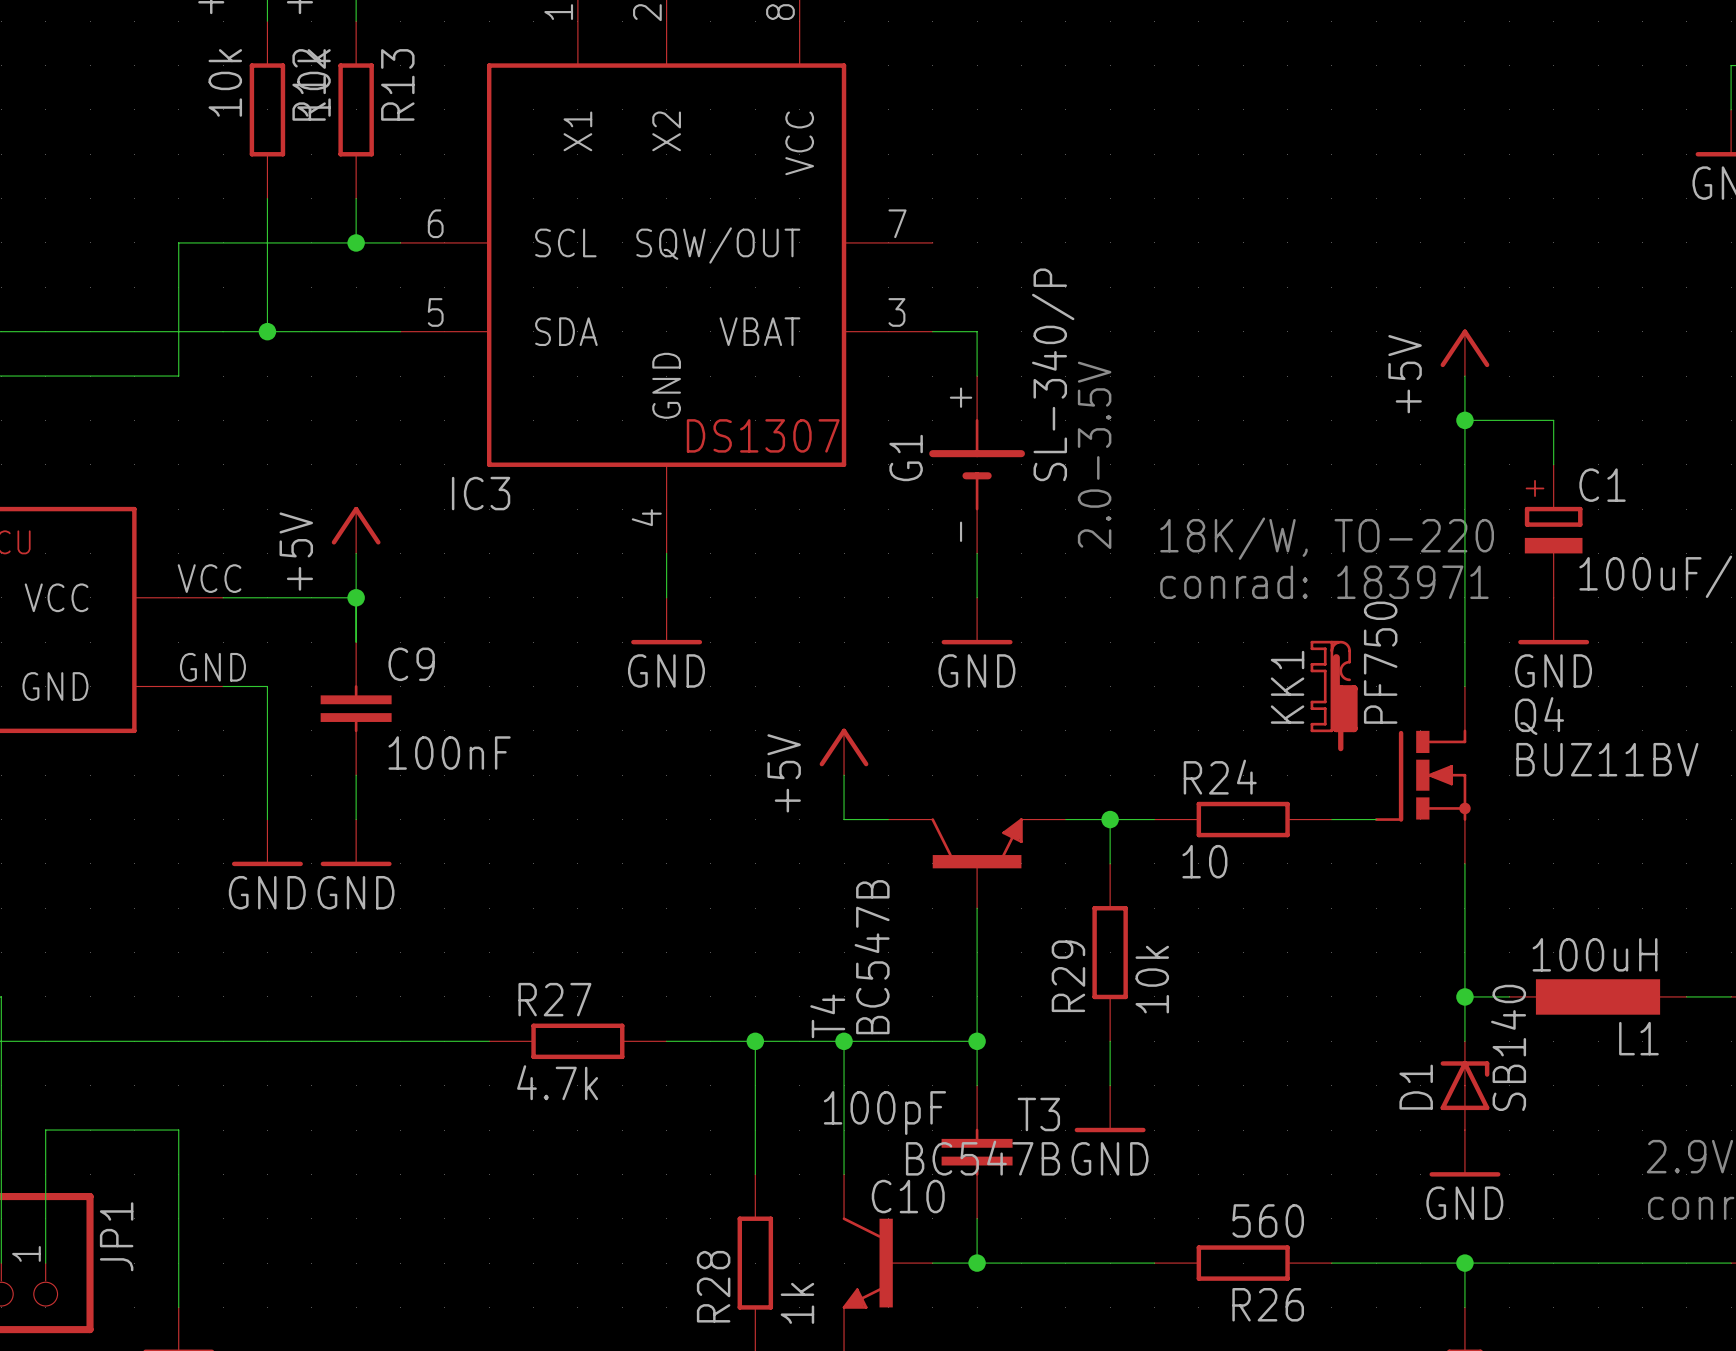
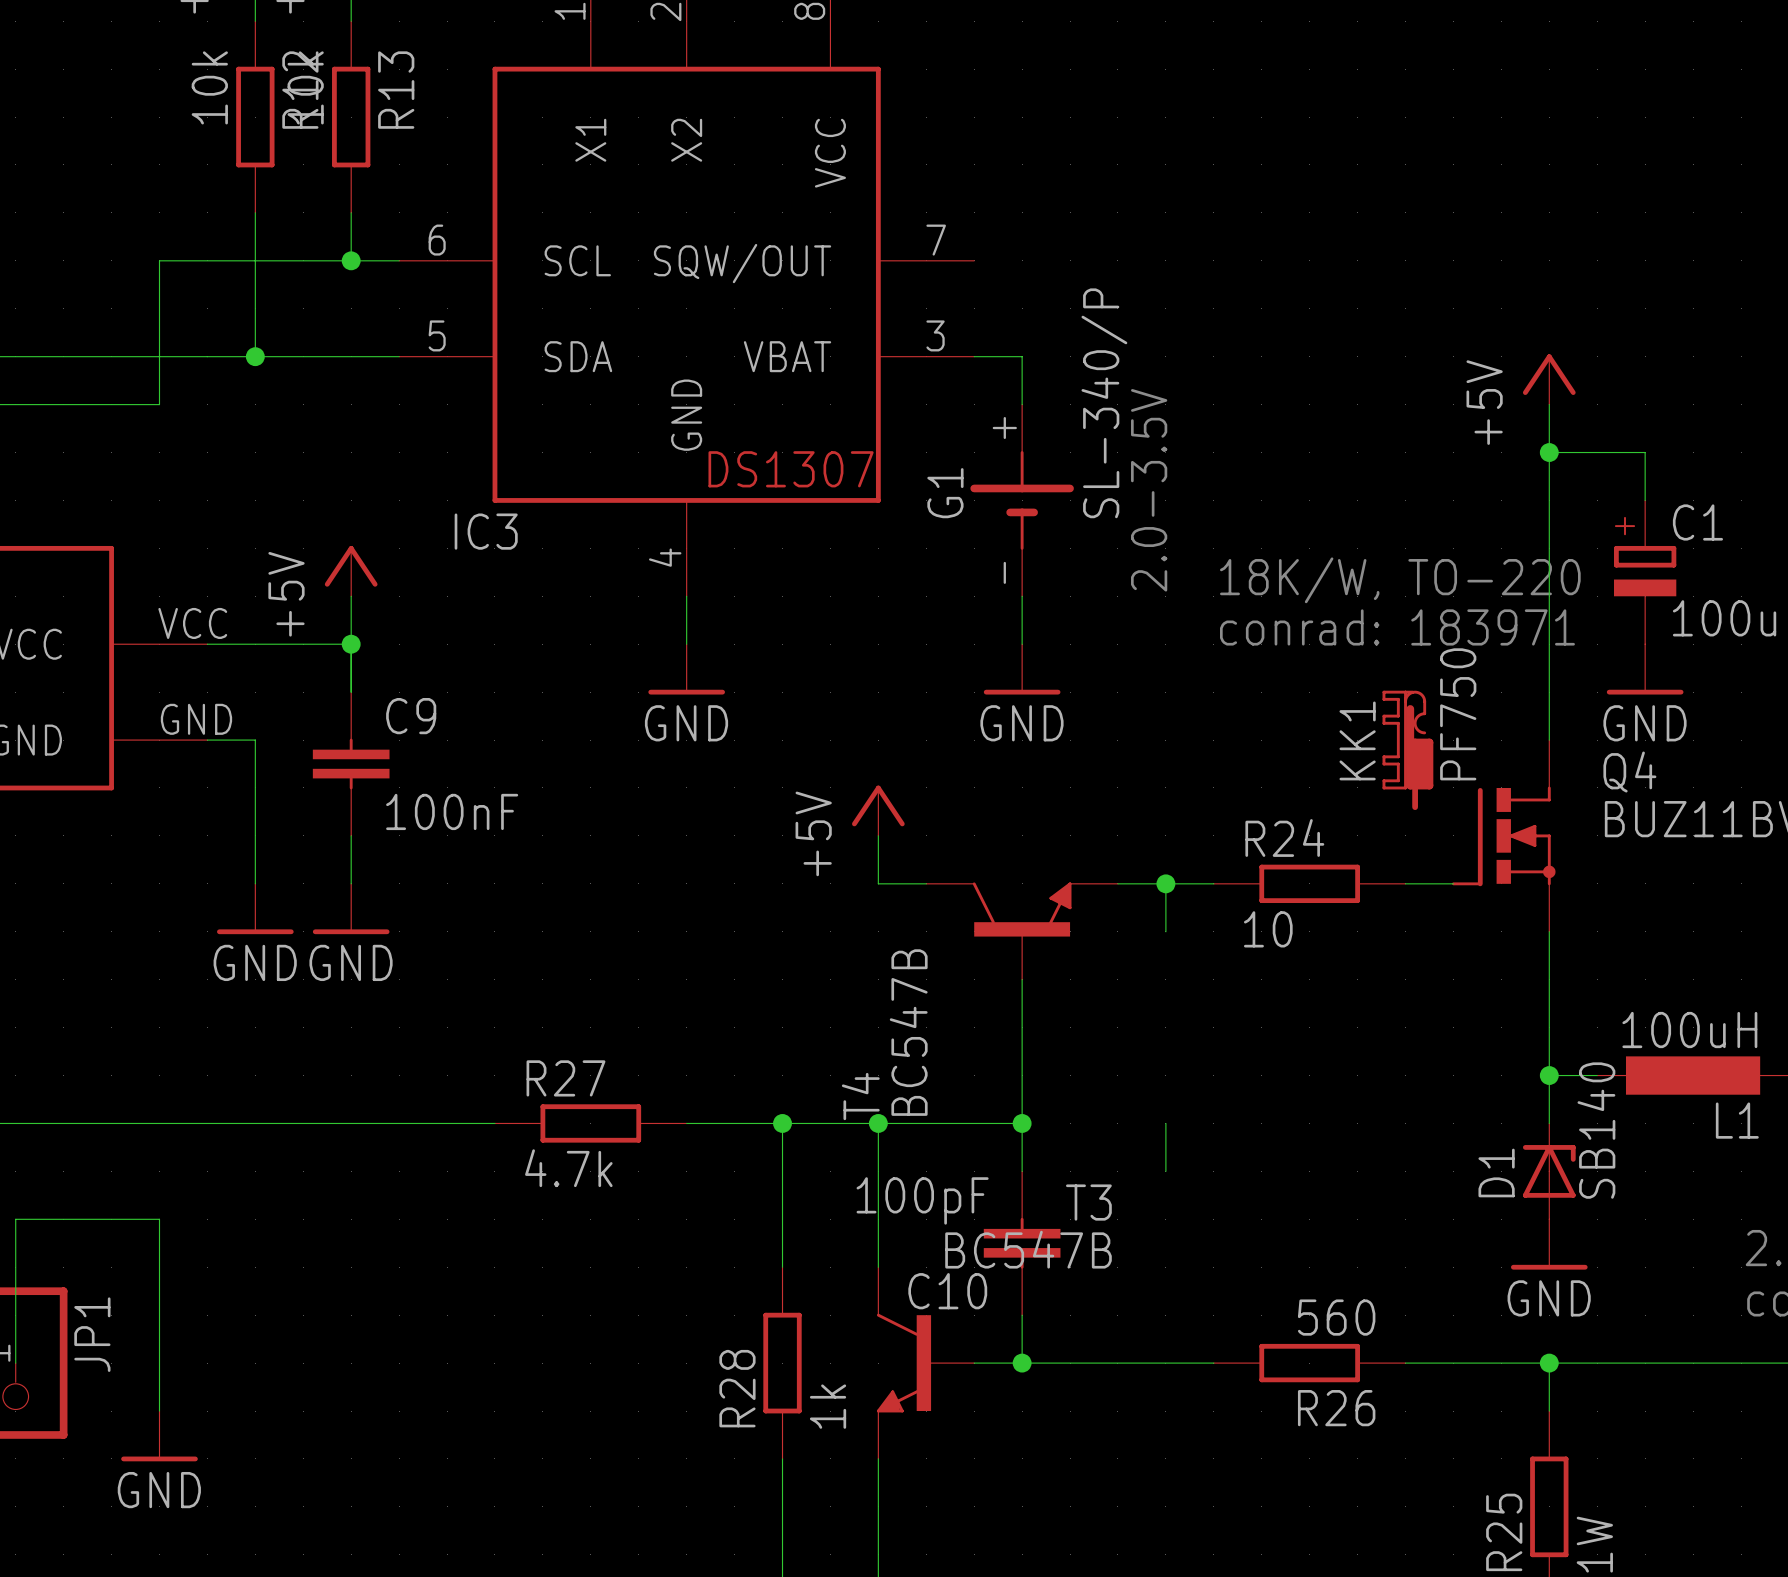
R29: 10k (1110, 952) -> none
power symbol: GND (1110, 1108) -> none

